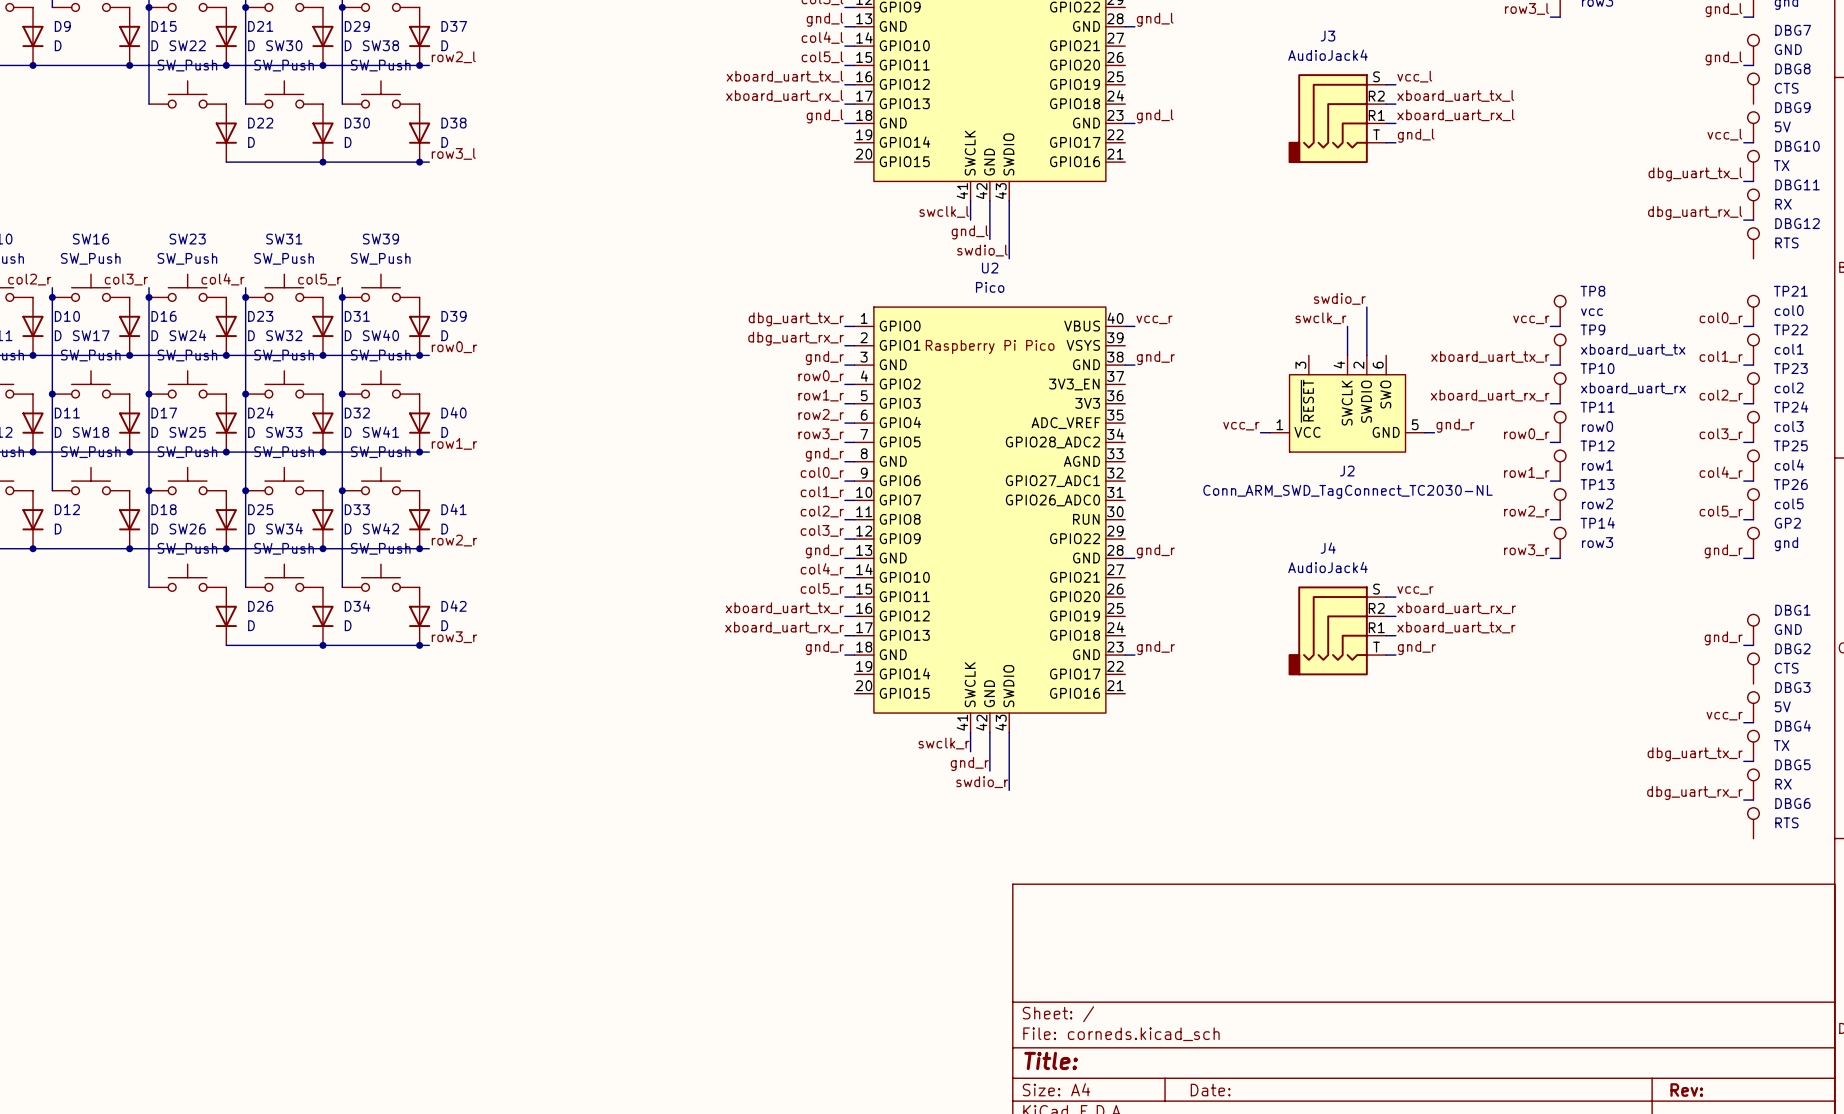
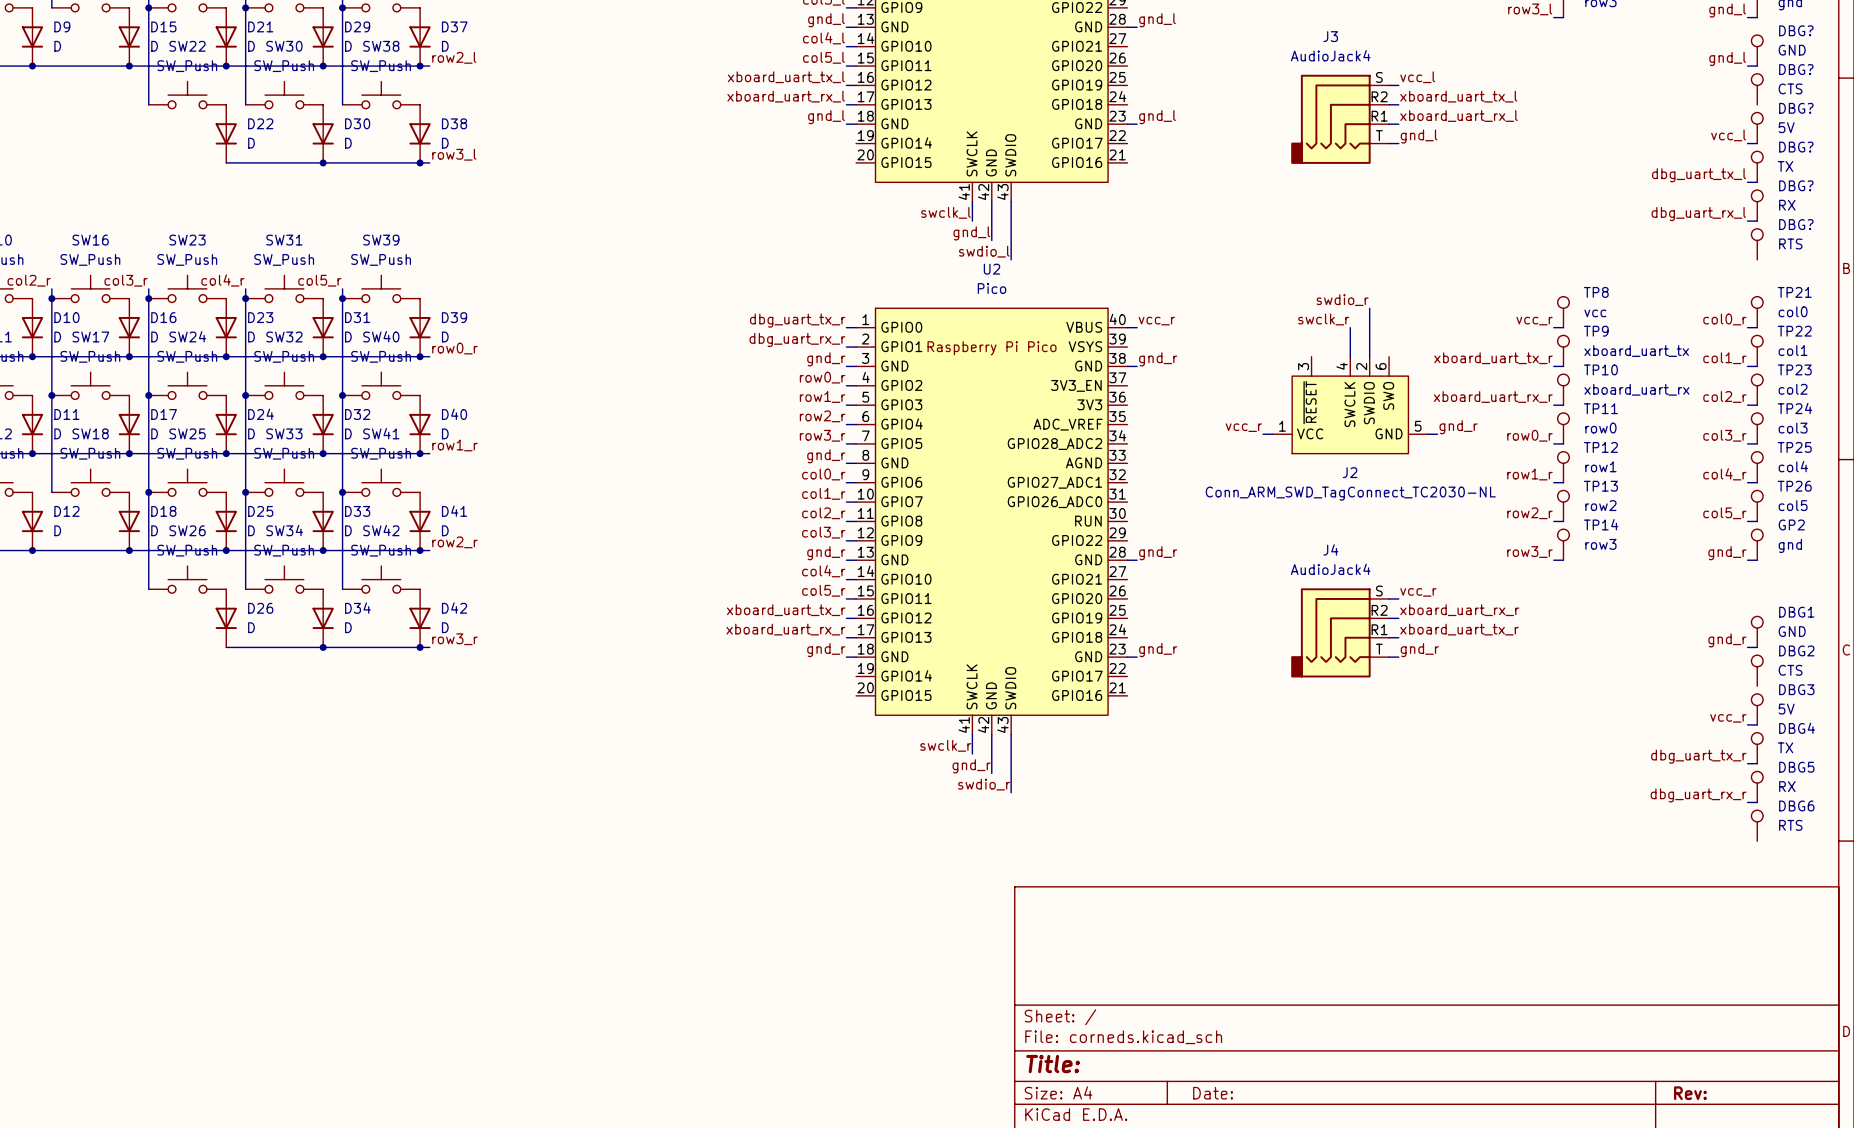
DBG7 name: DBG7 (1793, 30) -> DBG? (1796, 30)
DBG8 name: DBG8 (1792, 68) -> DBG? (1796, 69)
DBG9 name: DBG9 (1792, 107) -> DBG? (1796, 108)
DBG10 name: DBG10 (1797, 146) -> DBG? (1796, 147)
DBG11 name: DBG11 (1797, 184) -> DBG? (1796, 185)
DBG12 name: DBG12 (1797, 223) -> DBG? (1796, 224)

